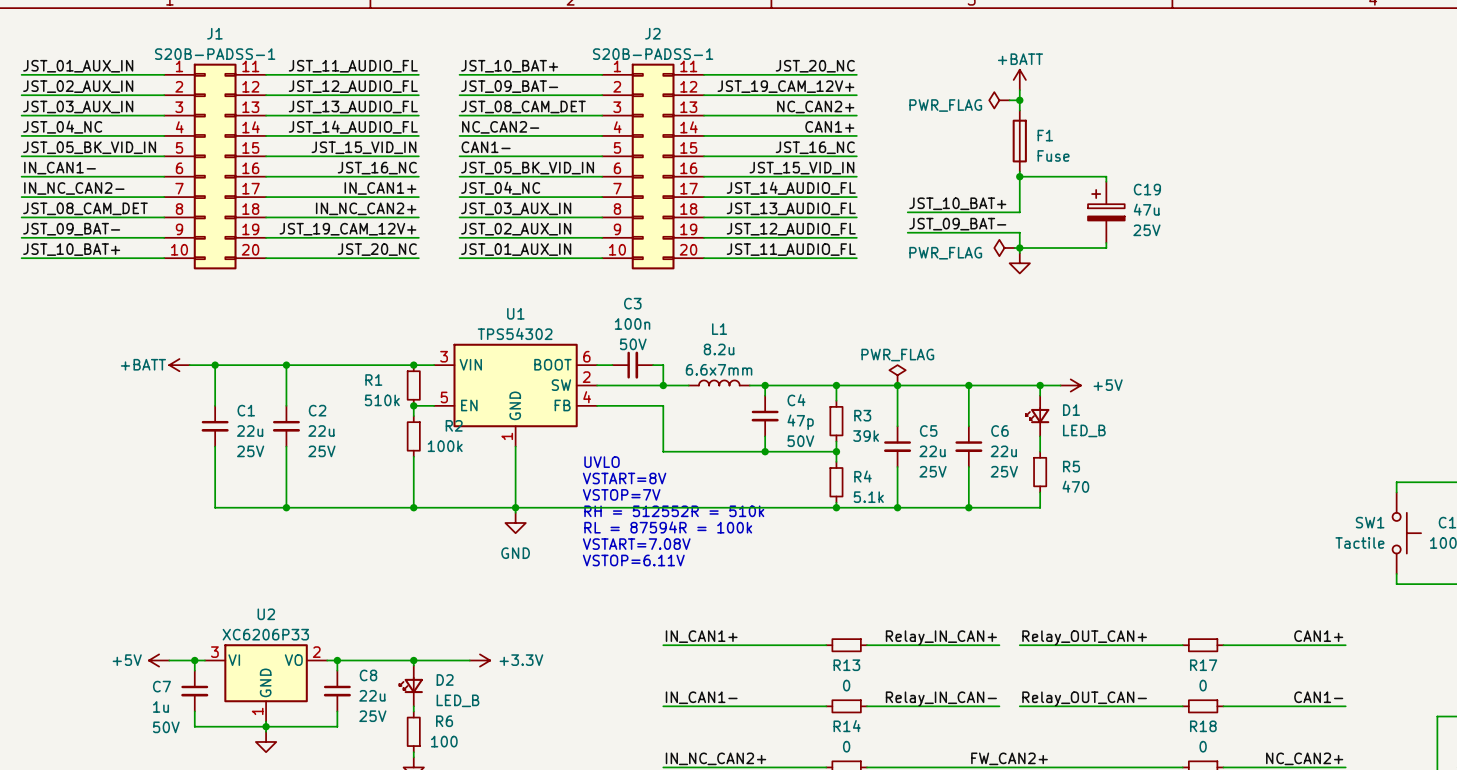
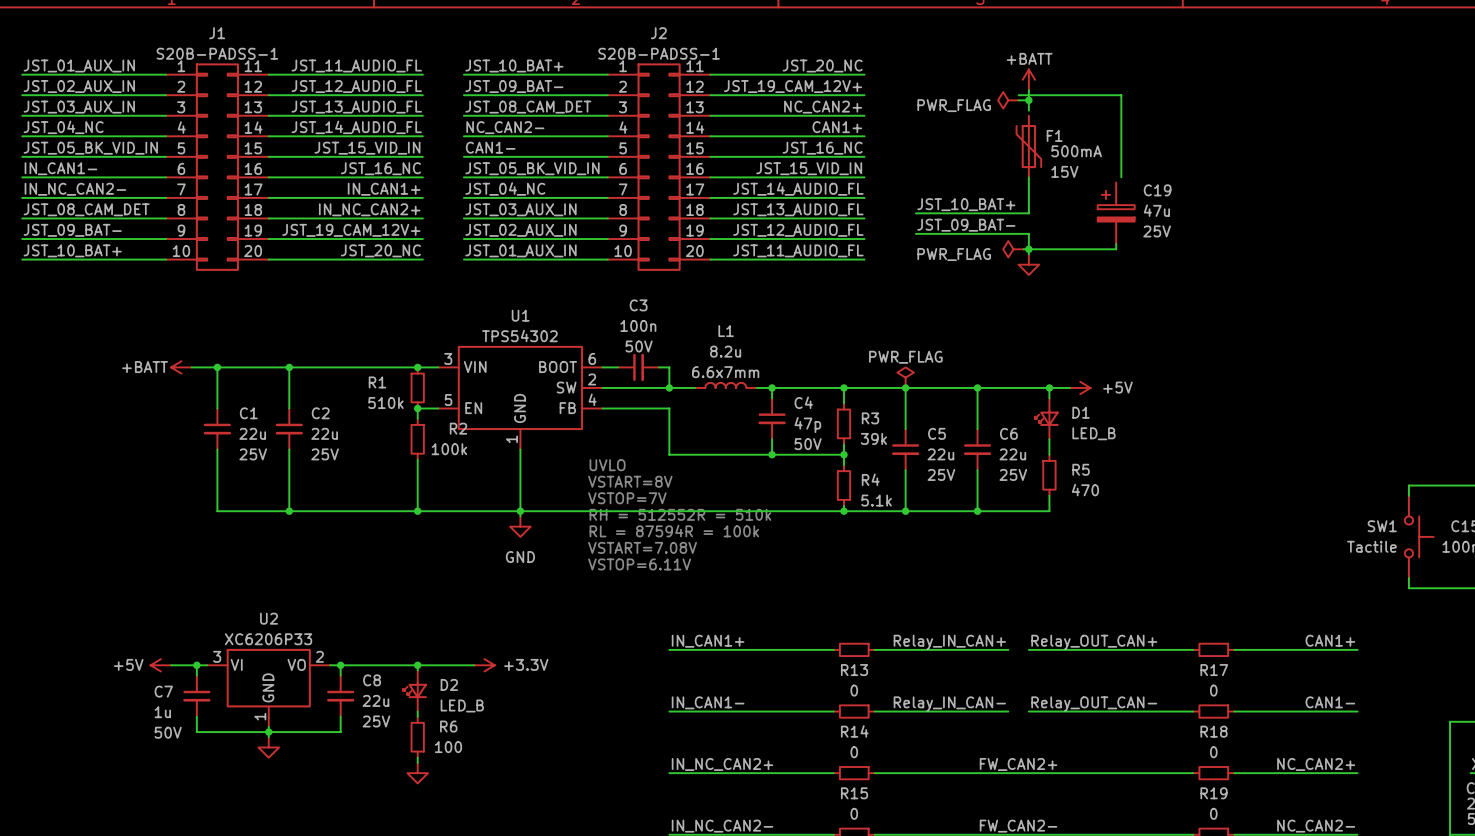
wire: none -> (1018, 95) (1121, 95) (1121, 177)
F1 symbol: [1012, 110, 1027, 172] -> [1016, 115, 1042, 178]
F1 value: Fuse (1053, 155) -> 500mA (1076, 151)
wire: (1019, 171) (1019, 176) (1106, 176) (1106, 181) -> none
F1 text: none -> 15V (1064, 171)
junction: (1019, 176) -> none

